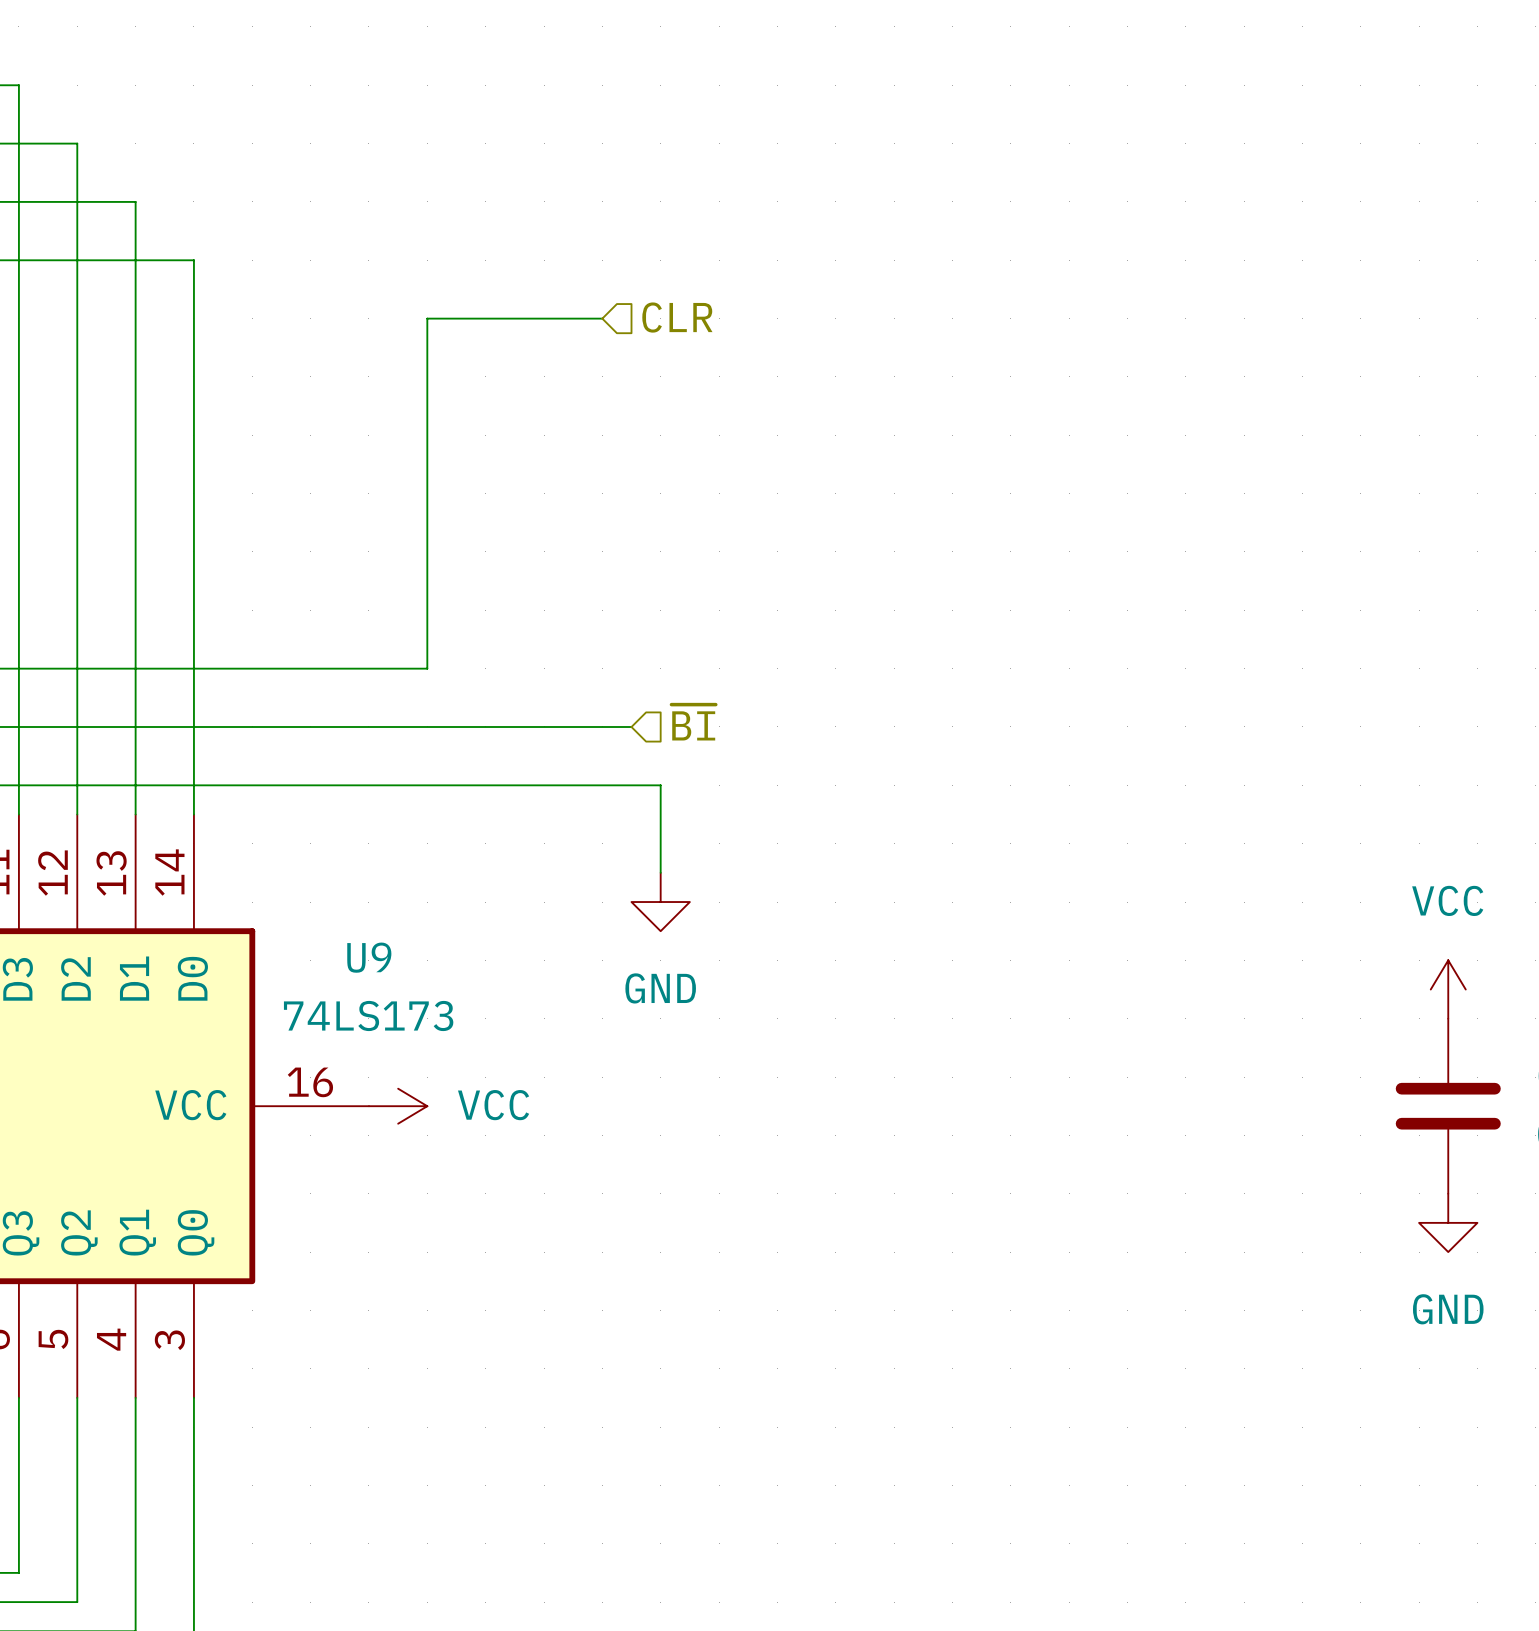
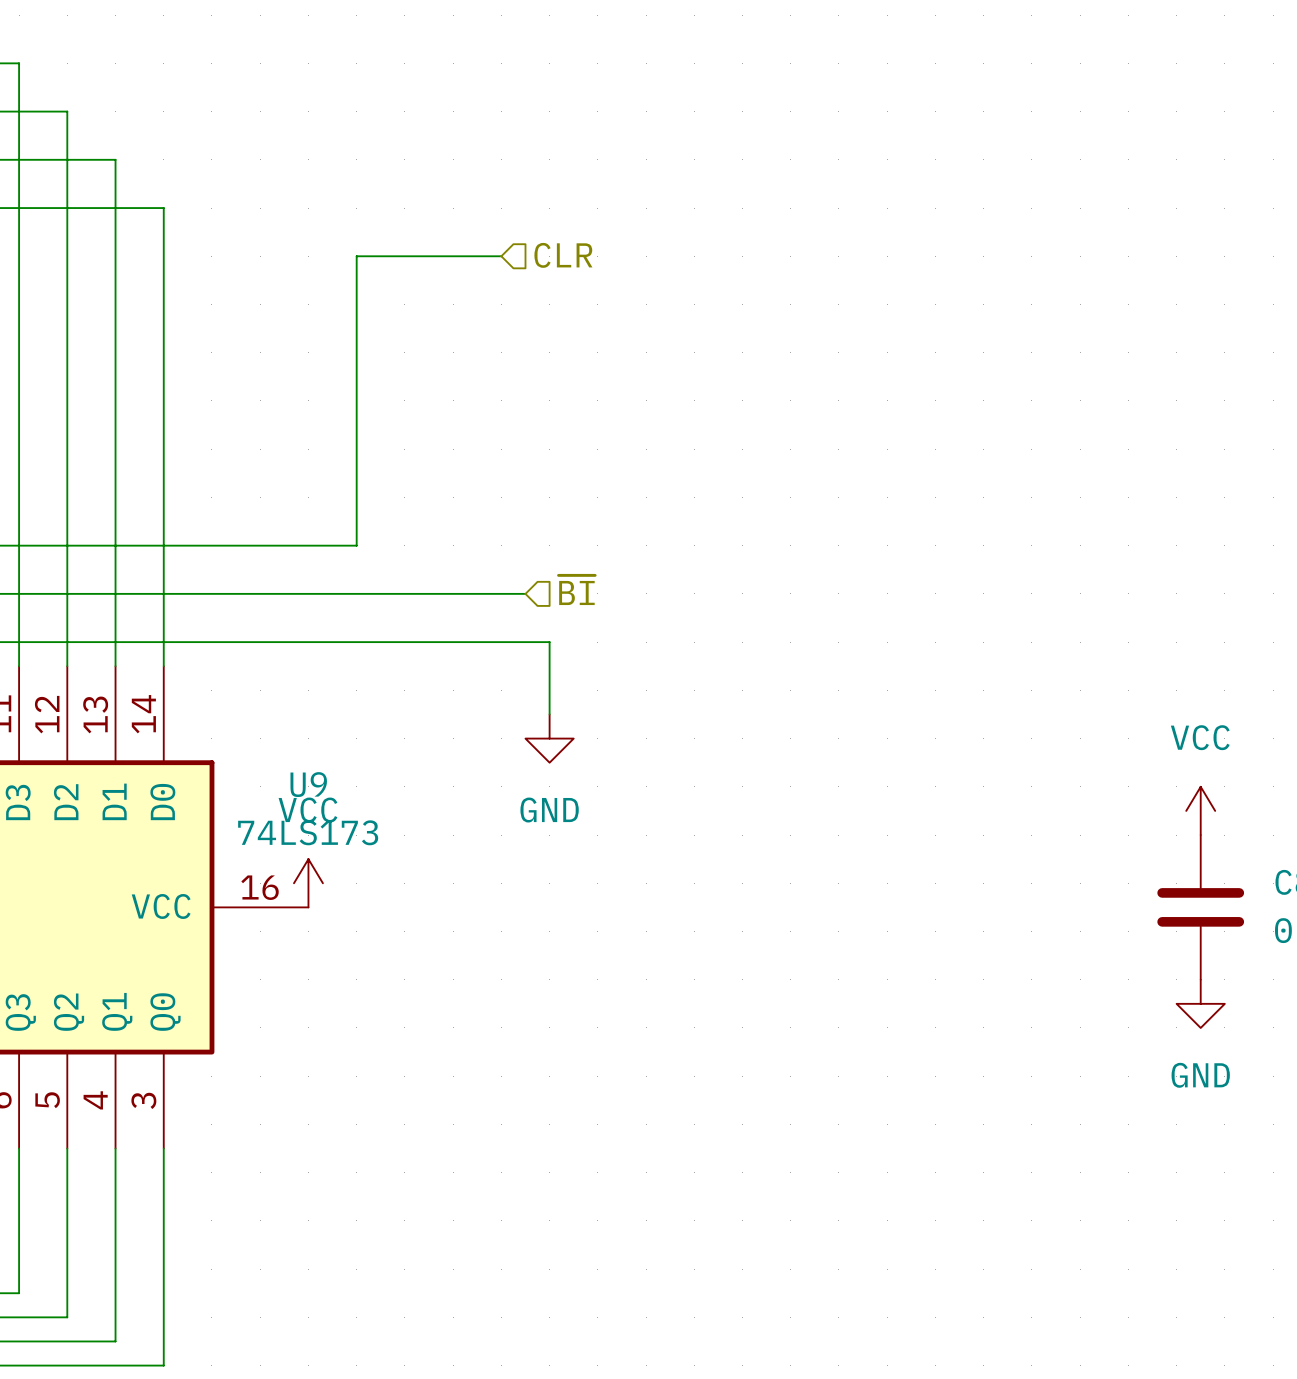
power symbol rotation: 0° (398, 1106) -> 90° counterclockwise (308, 883)
power symbol position: VCC (398, 1106) -> VCC (308, 883)

